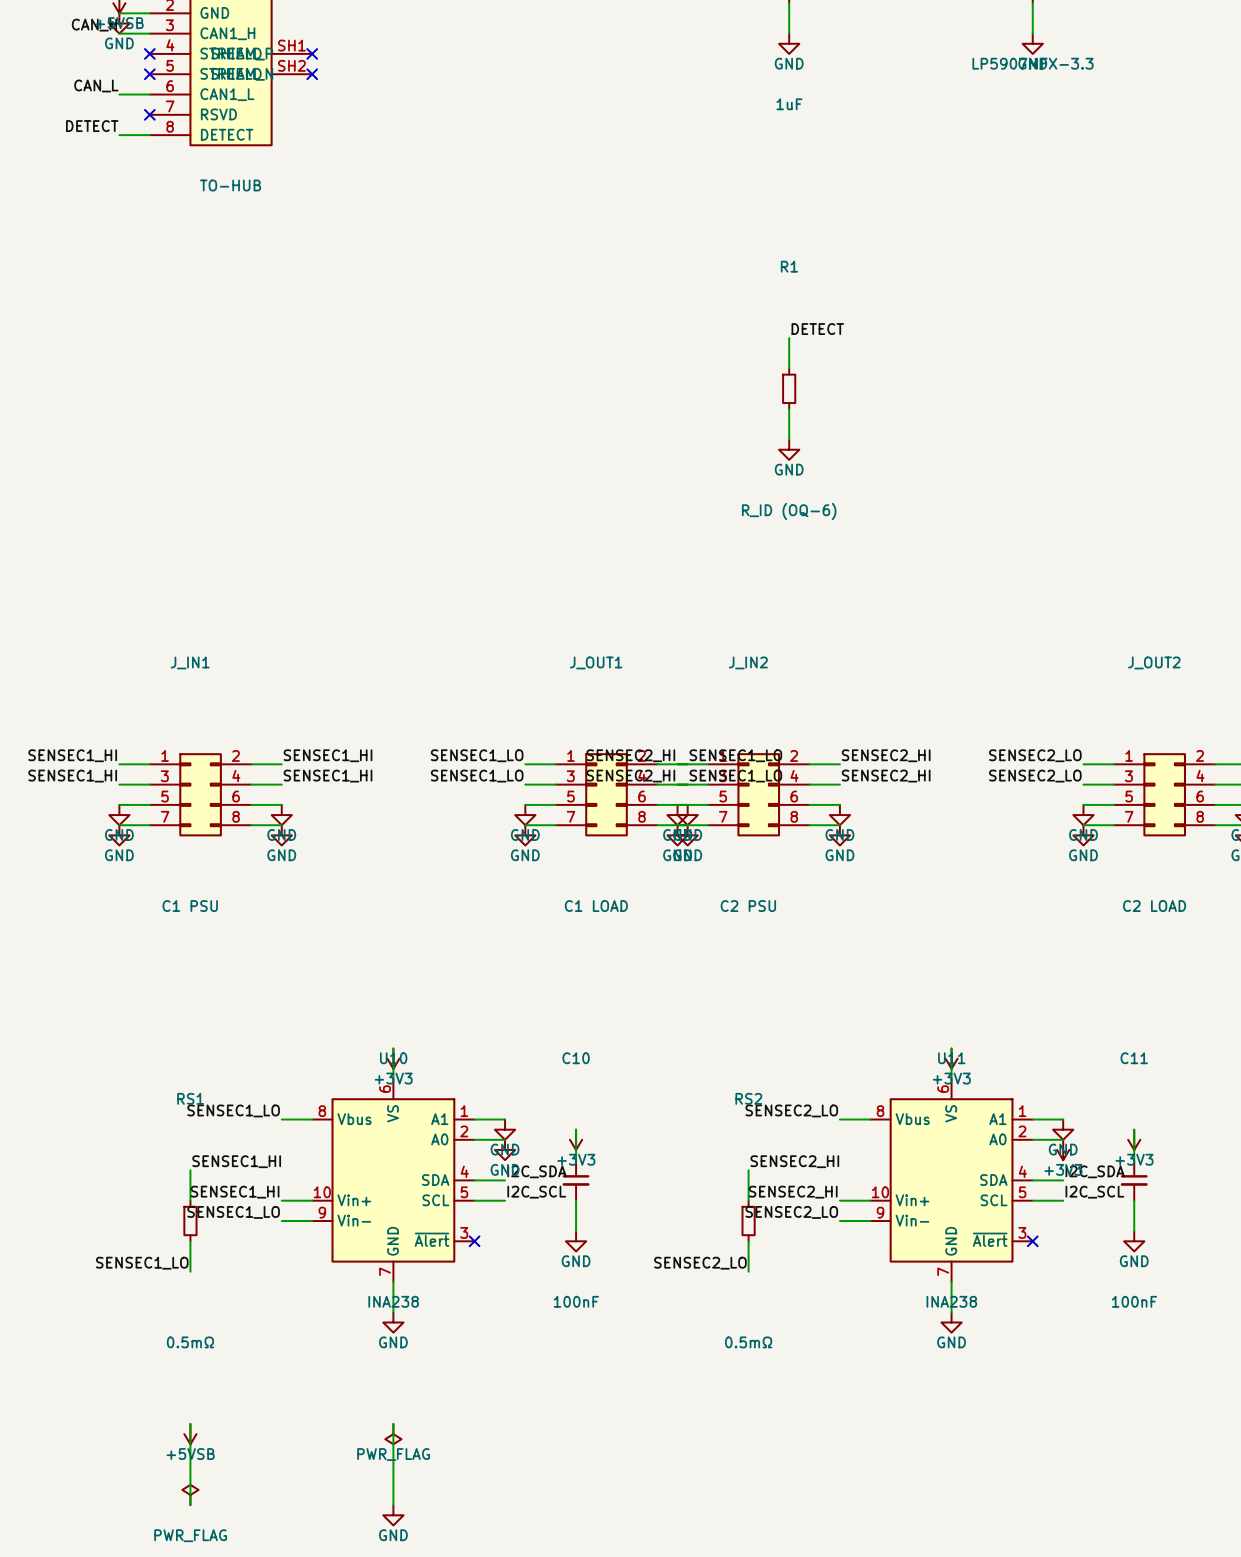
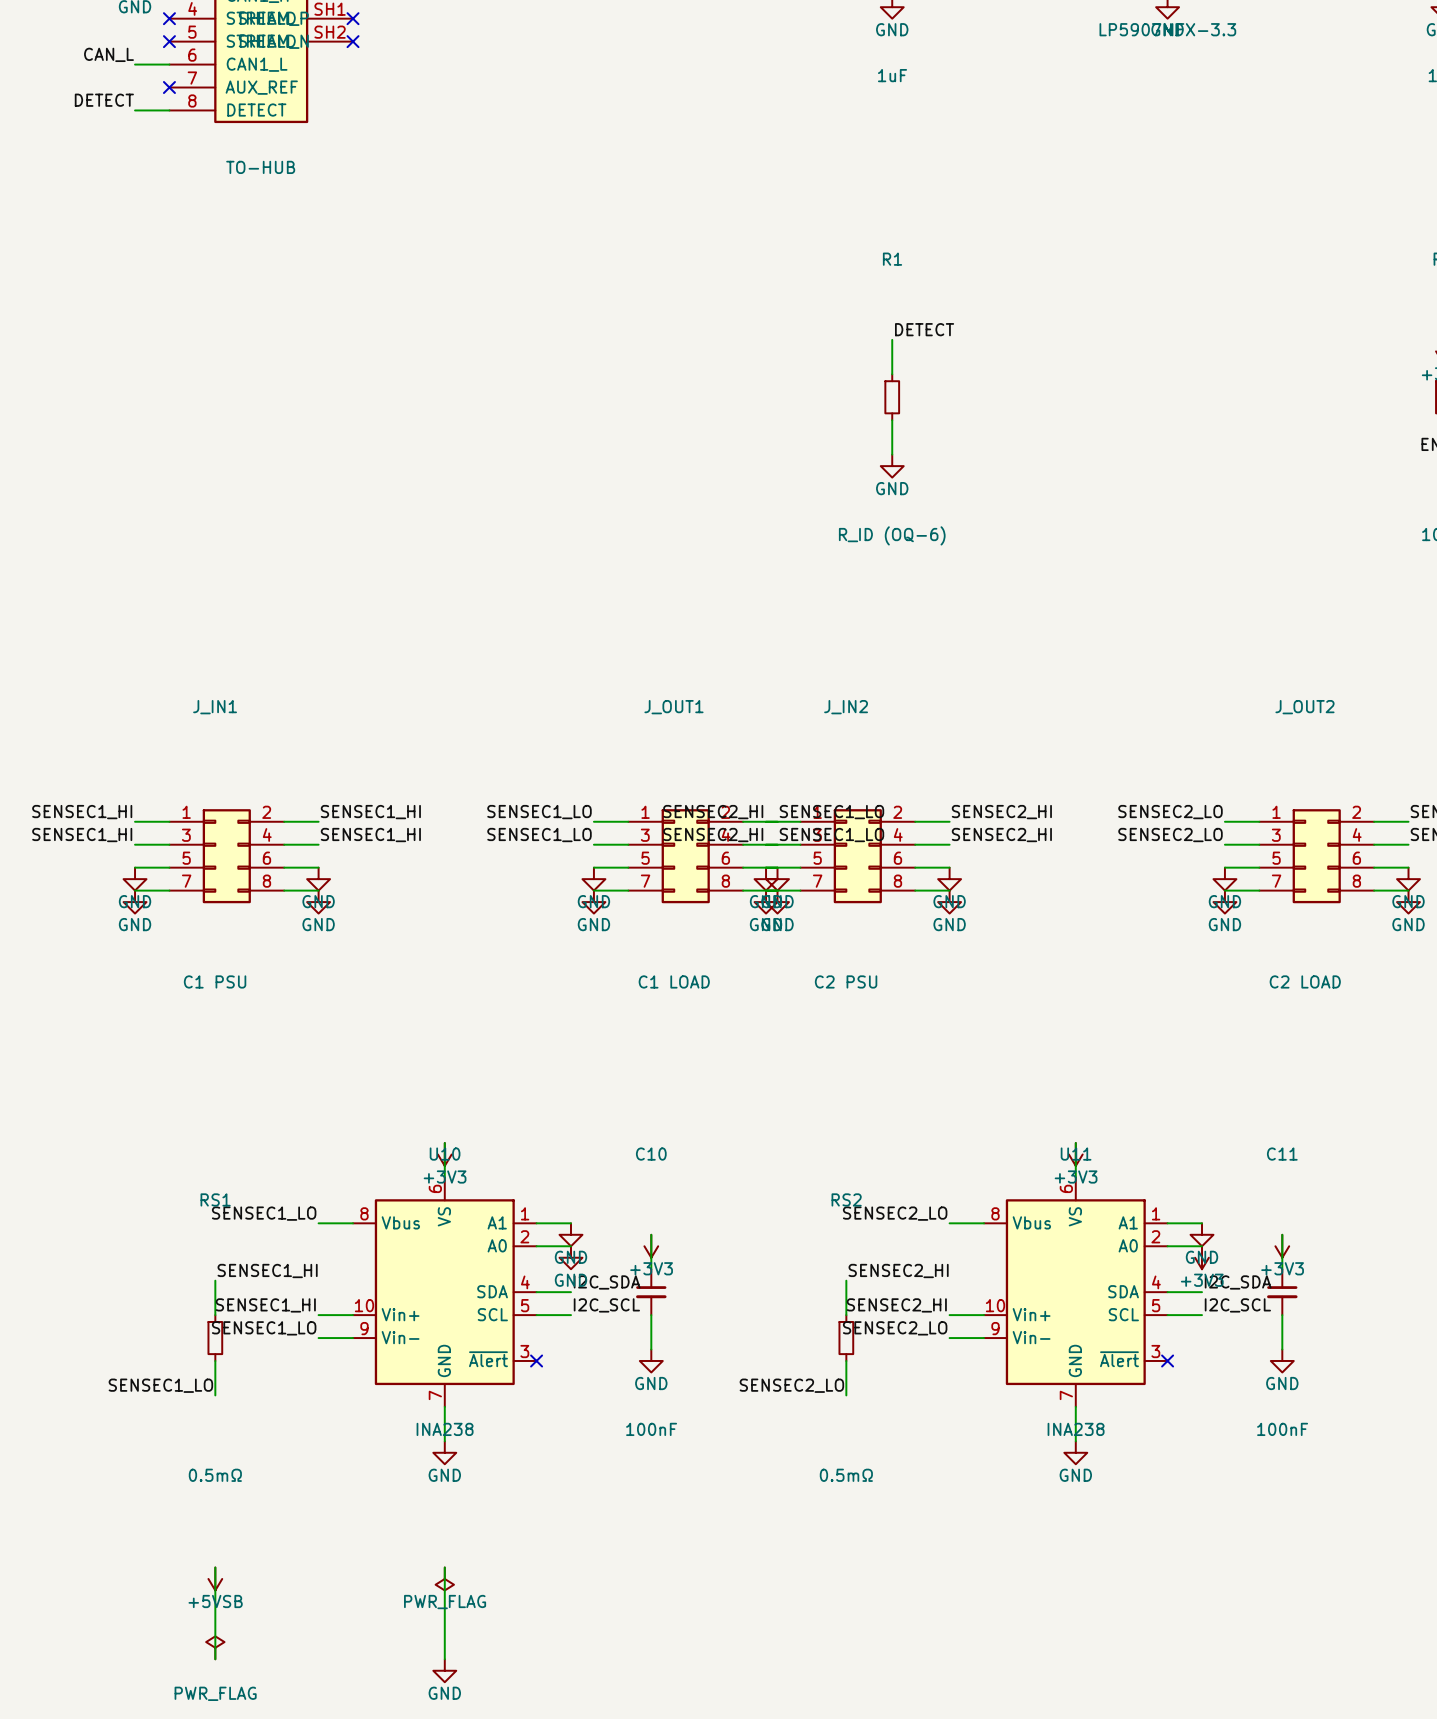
part pin name: RSVD (218, 114) -> AUX_REF (261, 87)

